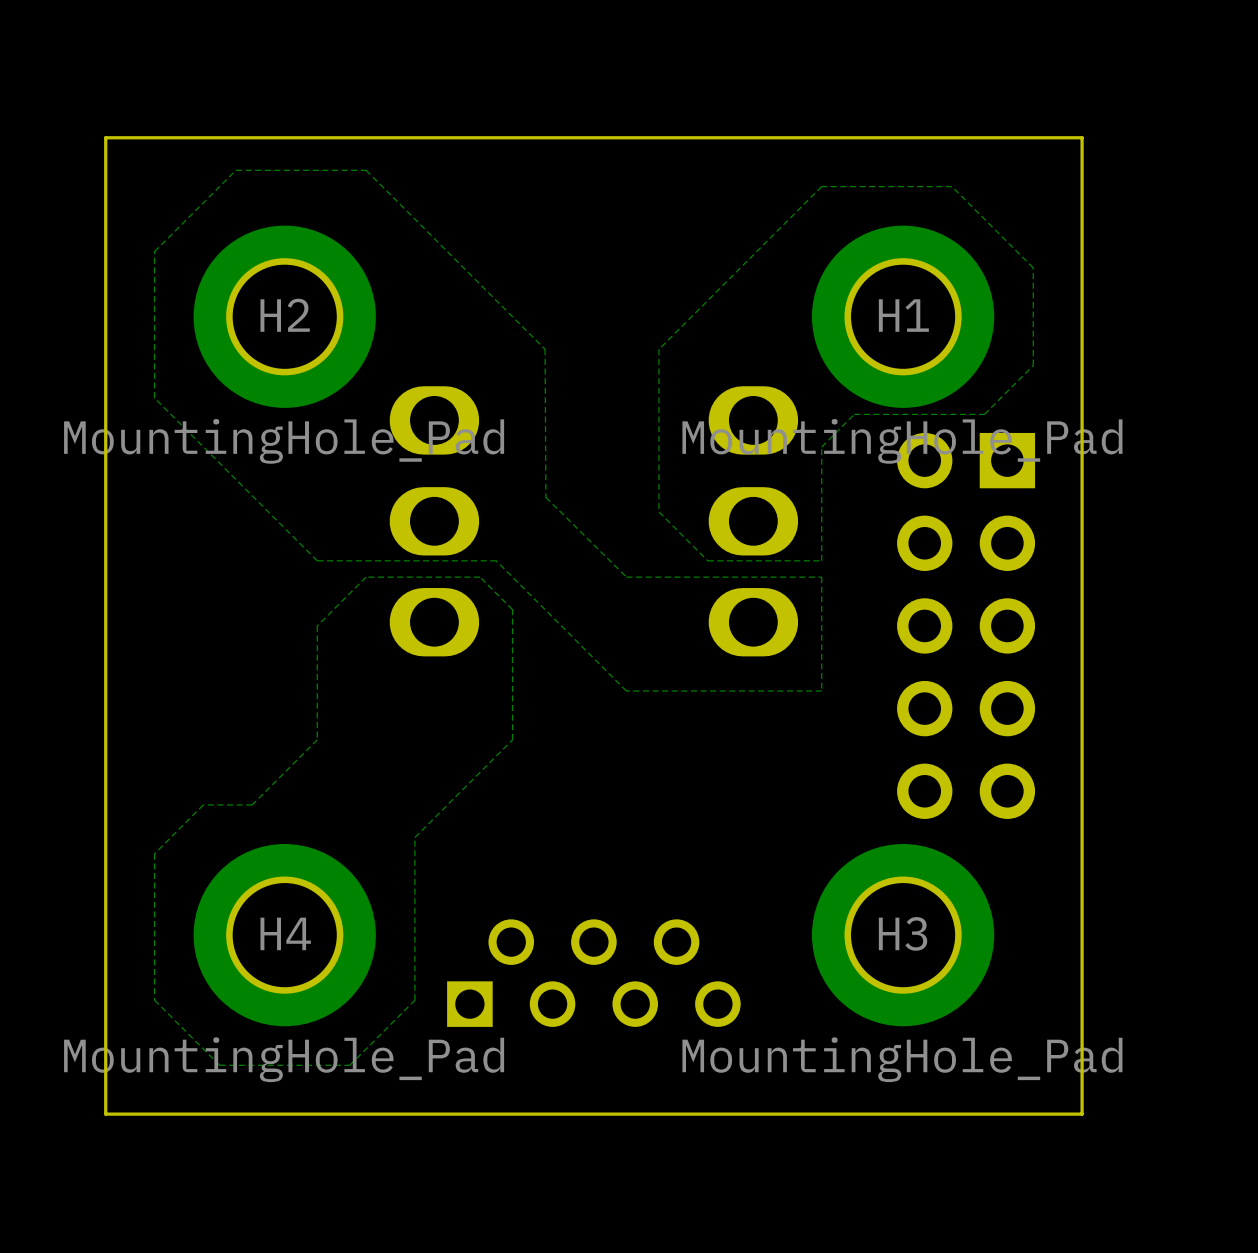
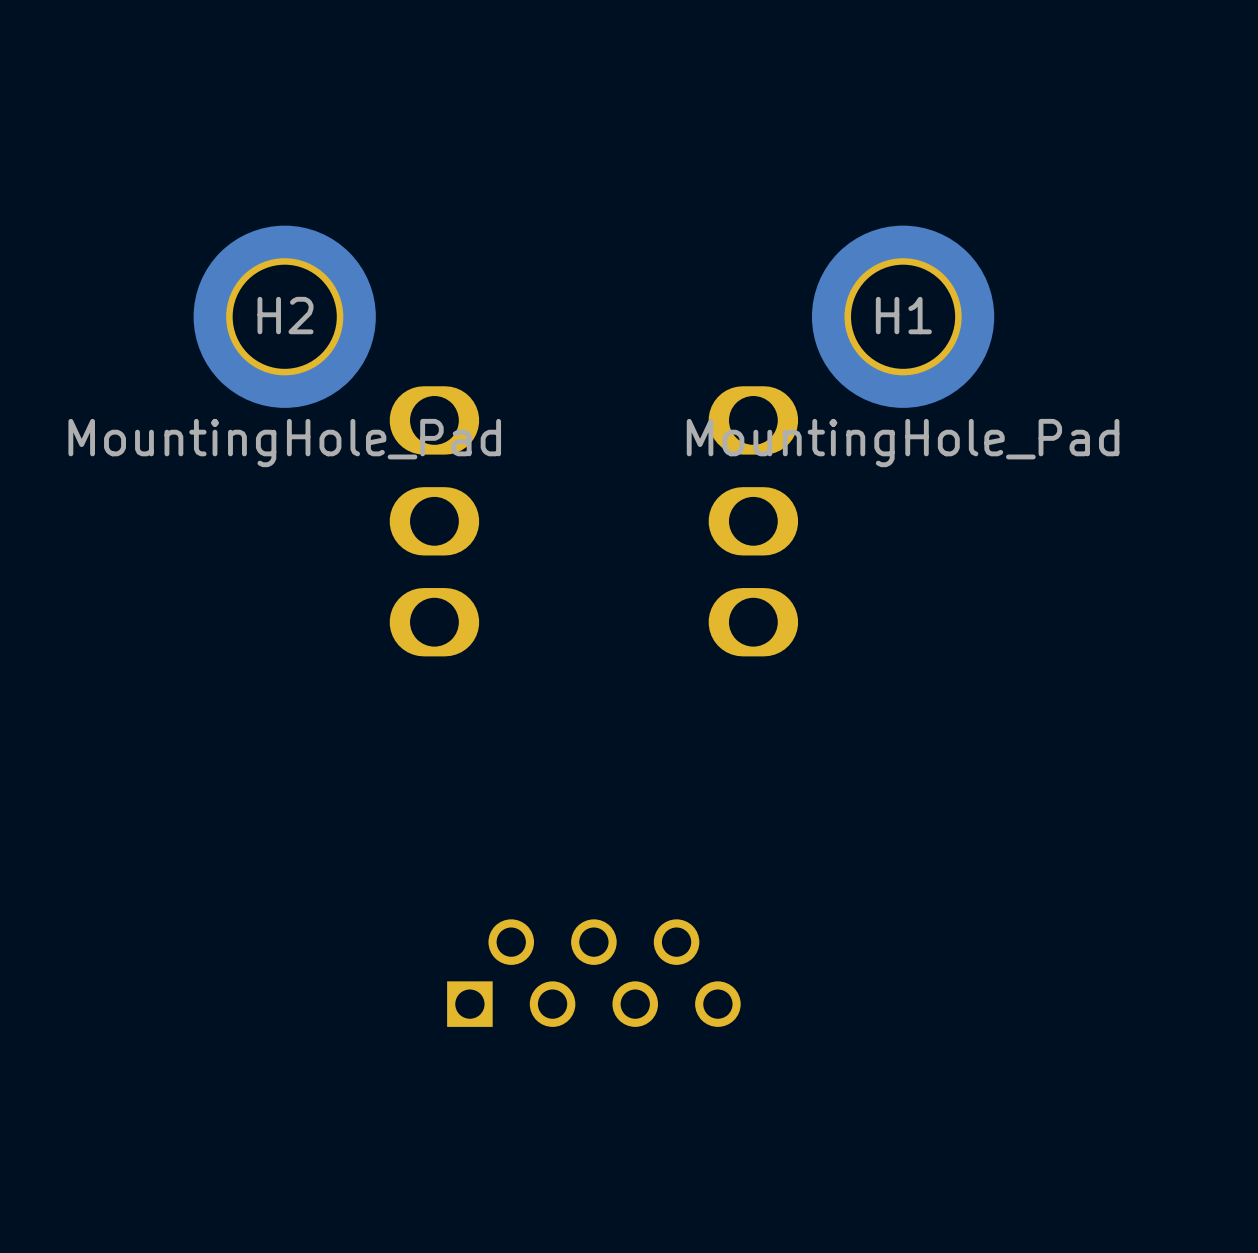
board edge: (1082, 137) (105, 137) (105, 1114) (1082, 1114) (1082, 137) -> none
zone outline: (366, 170) (235, 170) (154, 251) (154, 398) (317, 560) (496, 560) (626, 691) (821, 691) (821, 577) (626, 577) (545, 497) (545, 349) (366, 170) -> none
zone outline: (951, 186) (1033, 267) (1033, 365) (984, 414) (854, 414) (821, 446) (821, 560) (707, 560) (658, 512) (658, 349) (821, 186) (951, 186) -> none
zone outline: (479, 577) (512, 609) (512, 739) (414, 837) (414, 1000) (349, 1065) (219, 1065) (154, 1000) (154, 853) (203, 804) (252, 804) (317, 739) (317, 625) (366, 577) (479, 577) -> none
part: (966, 625) -> none
H4: MountingHole_Pad (284, 935) -> none
H3: MountingHole_Pad (903, 935) -> none

